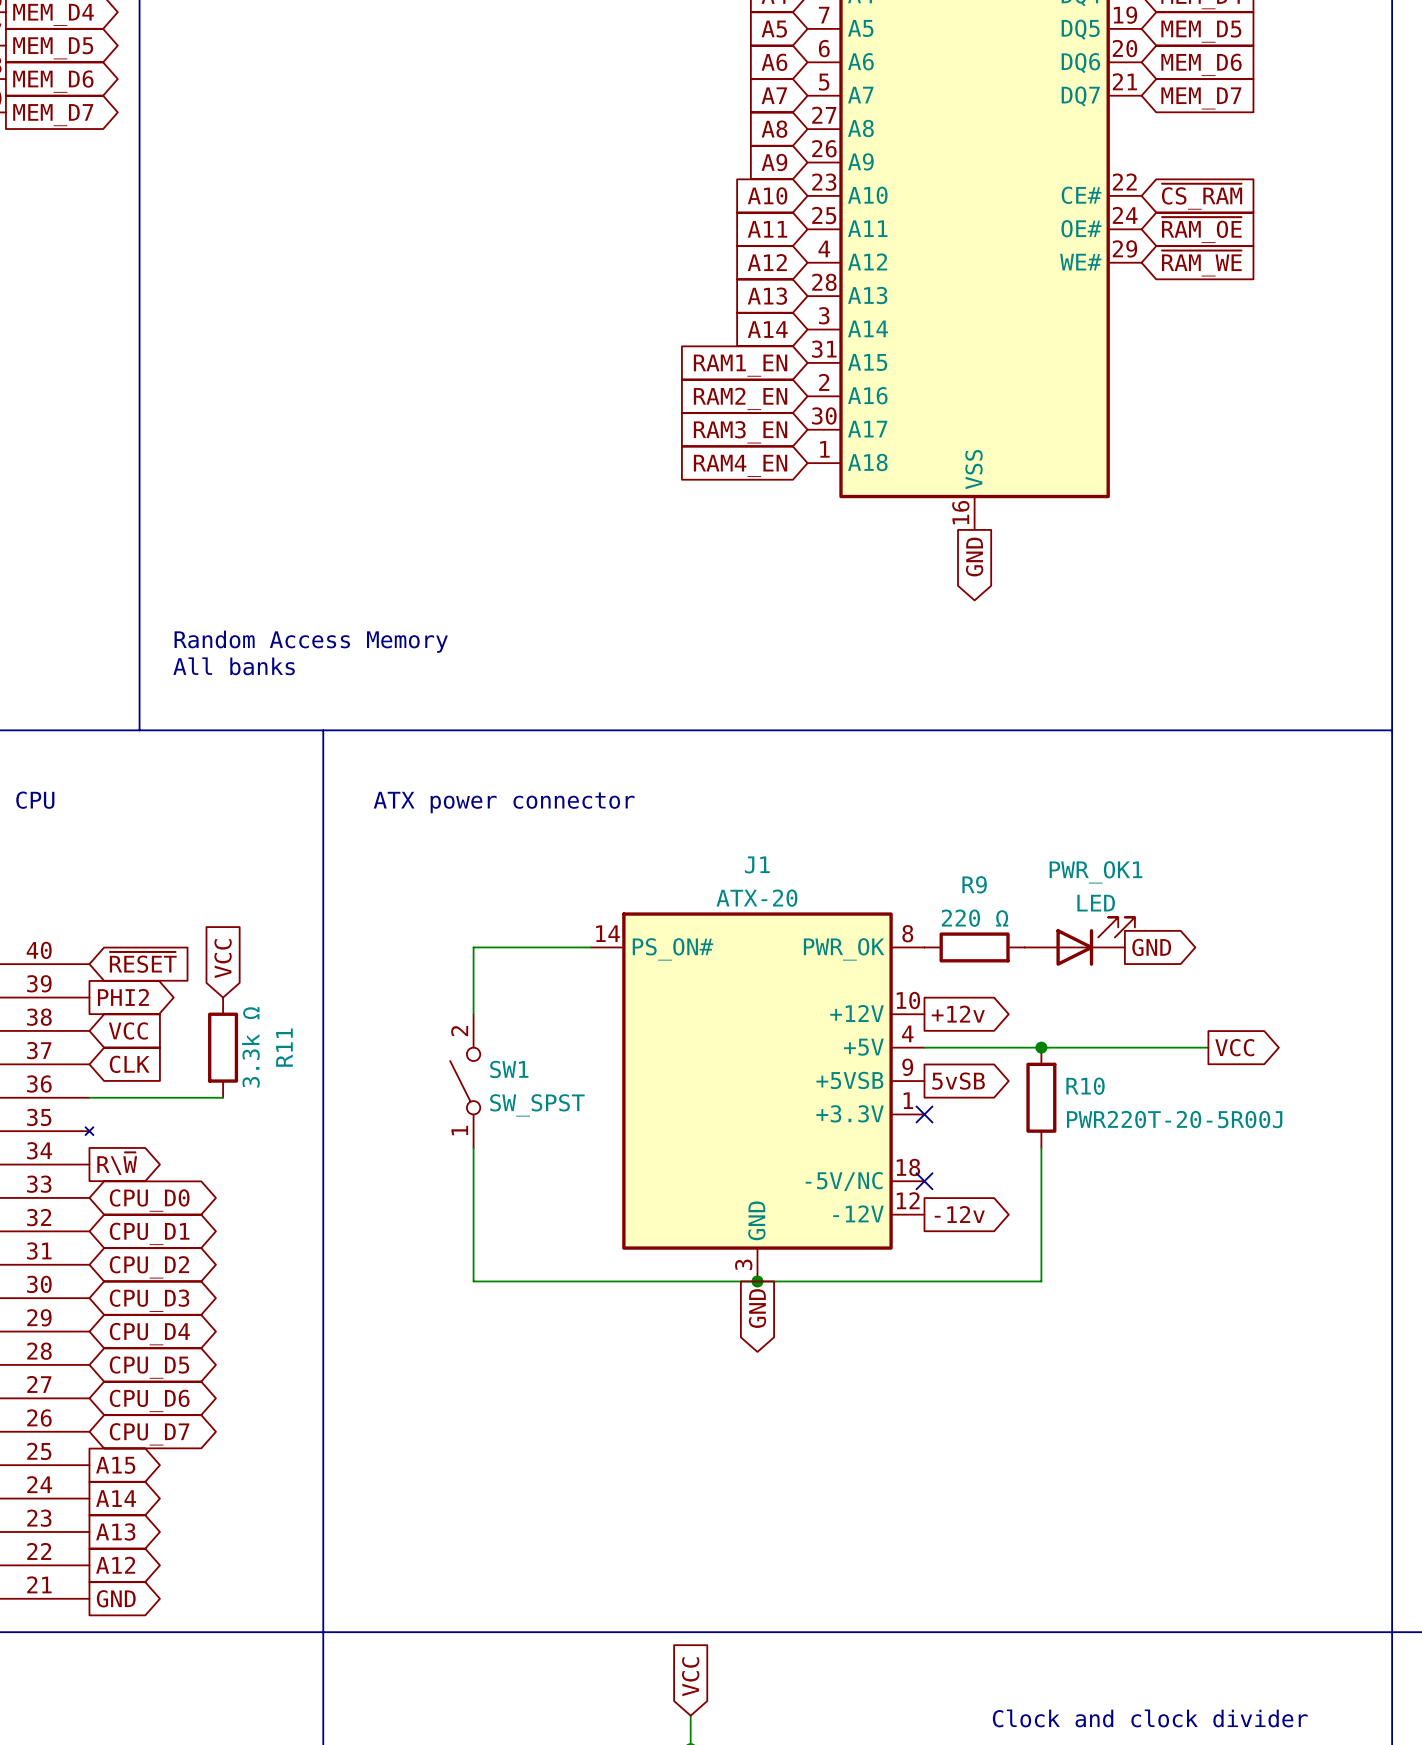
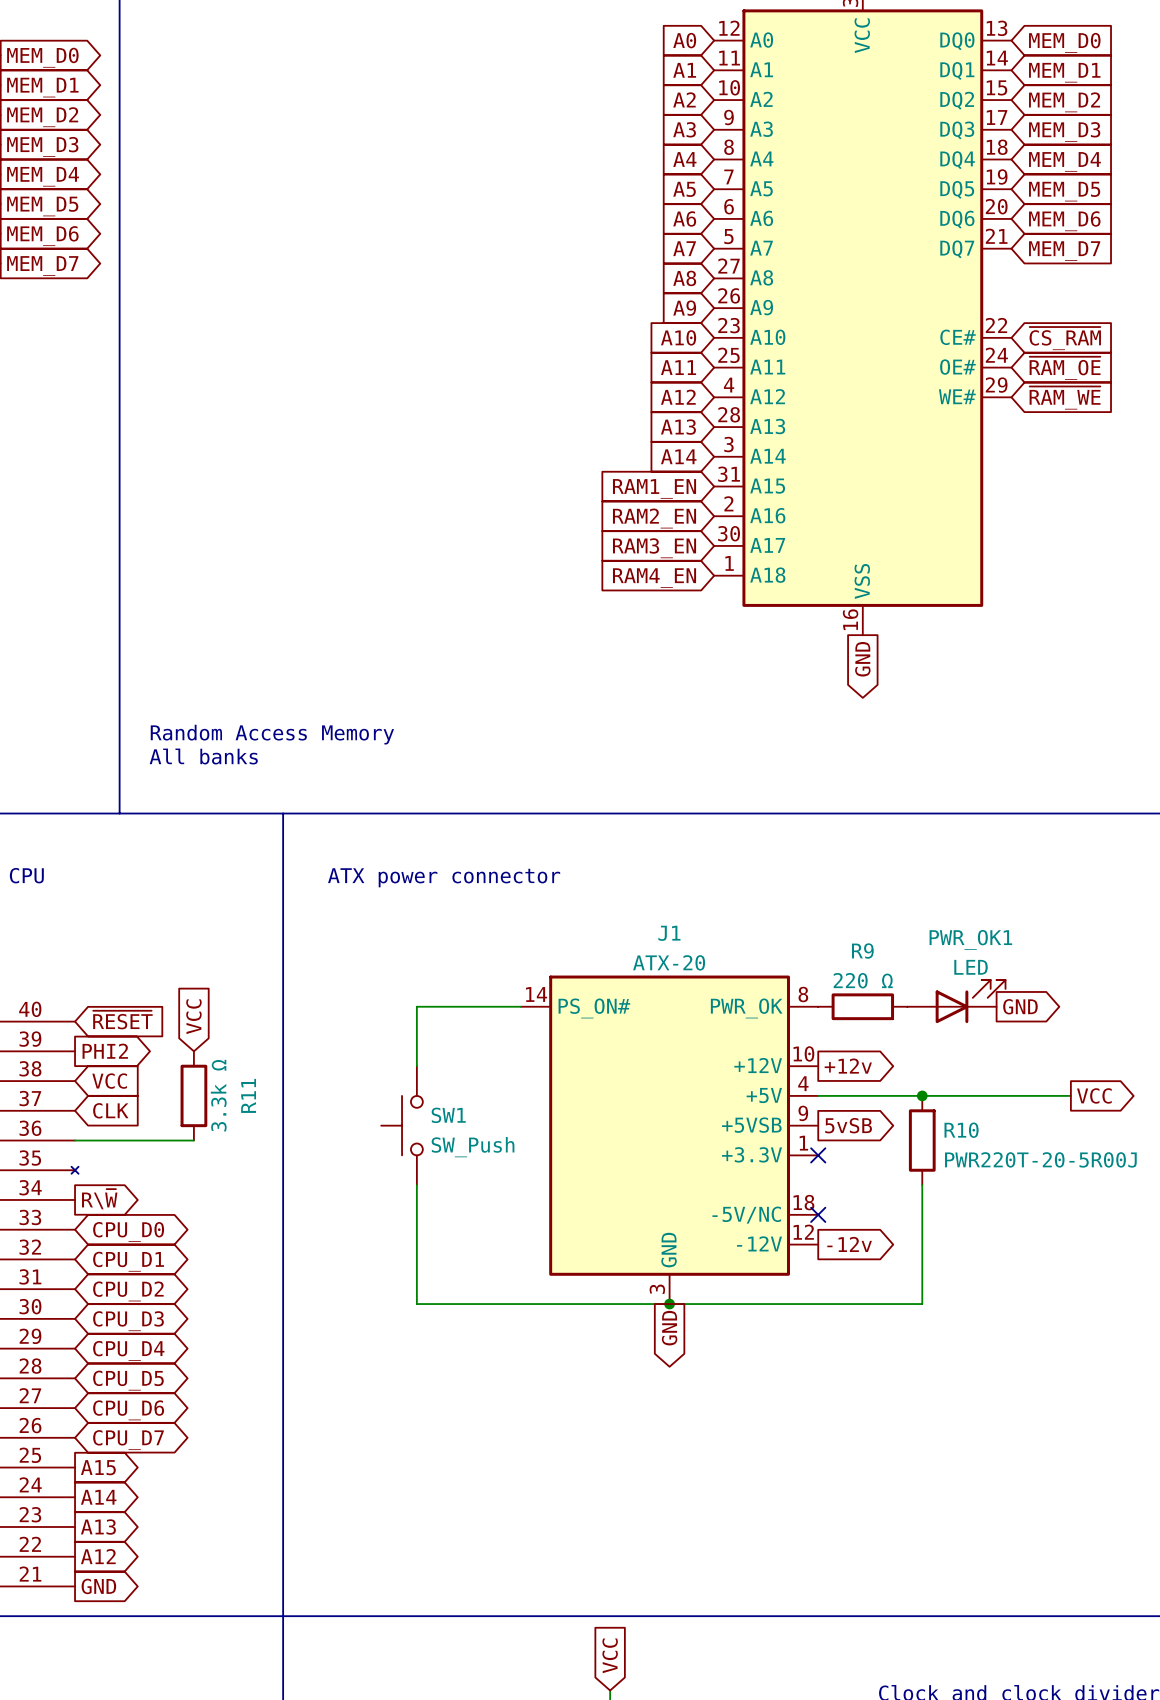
SW1 symbol: [450, 1014, 481, 1148] -> [381, 1066, 423, 1186]
SW1 value: SW_SPST (537, 1105) -> SW_Push (473, 1147)

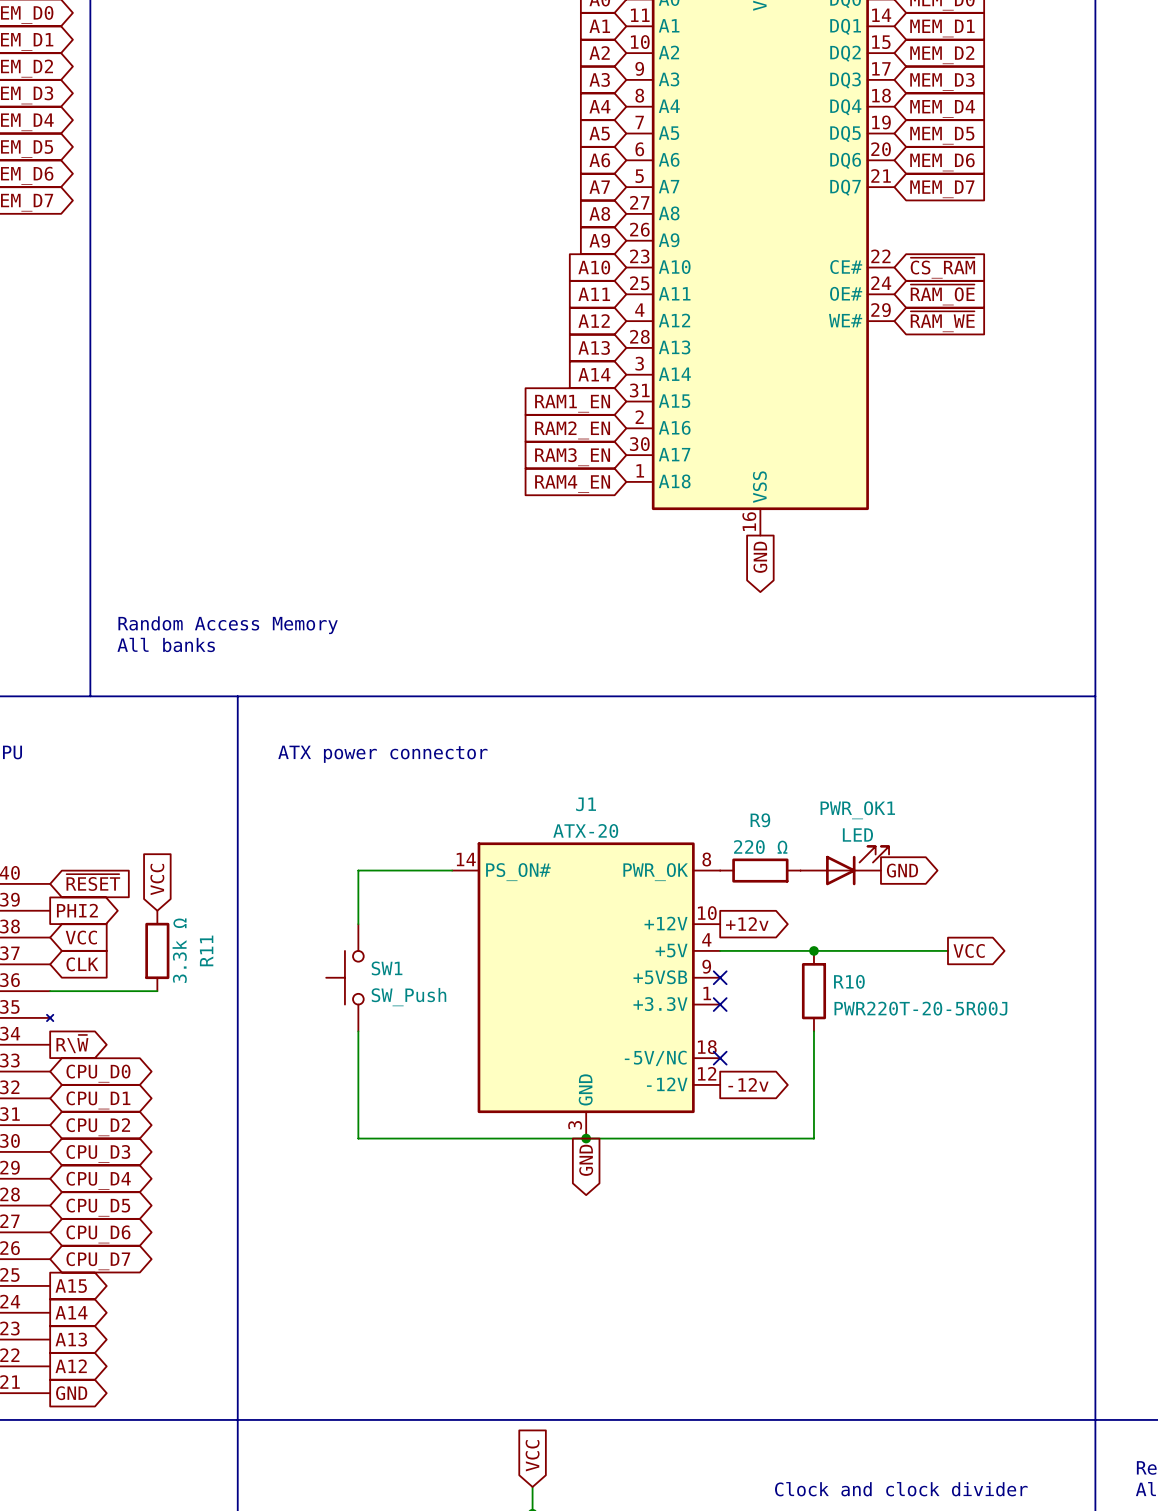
no-connect mark: none -> (720, 977)
global label: 5vSB (848, 1125) -> none

